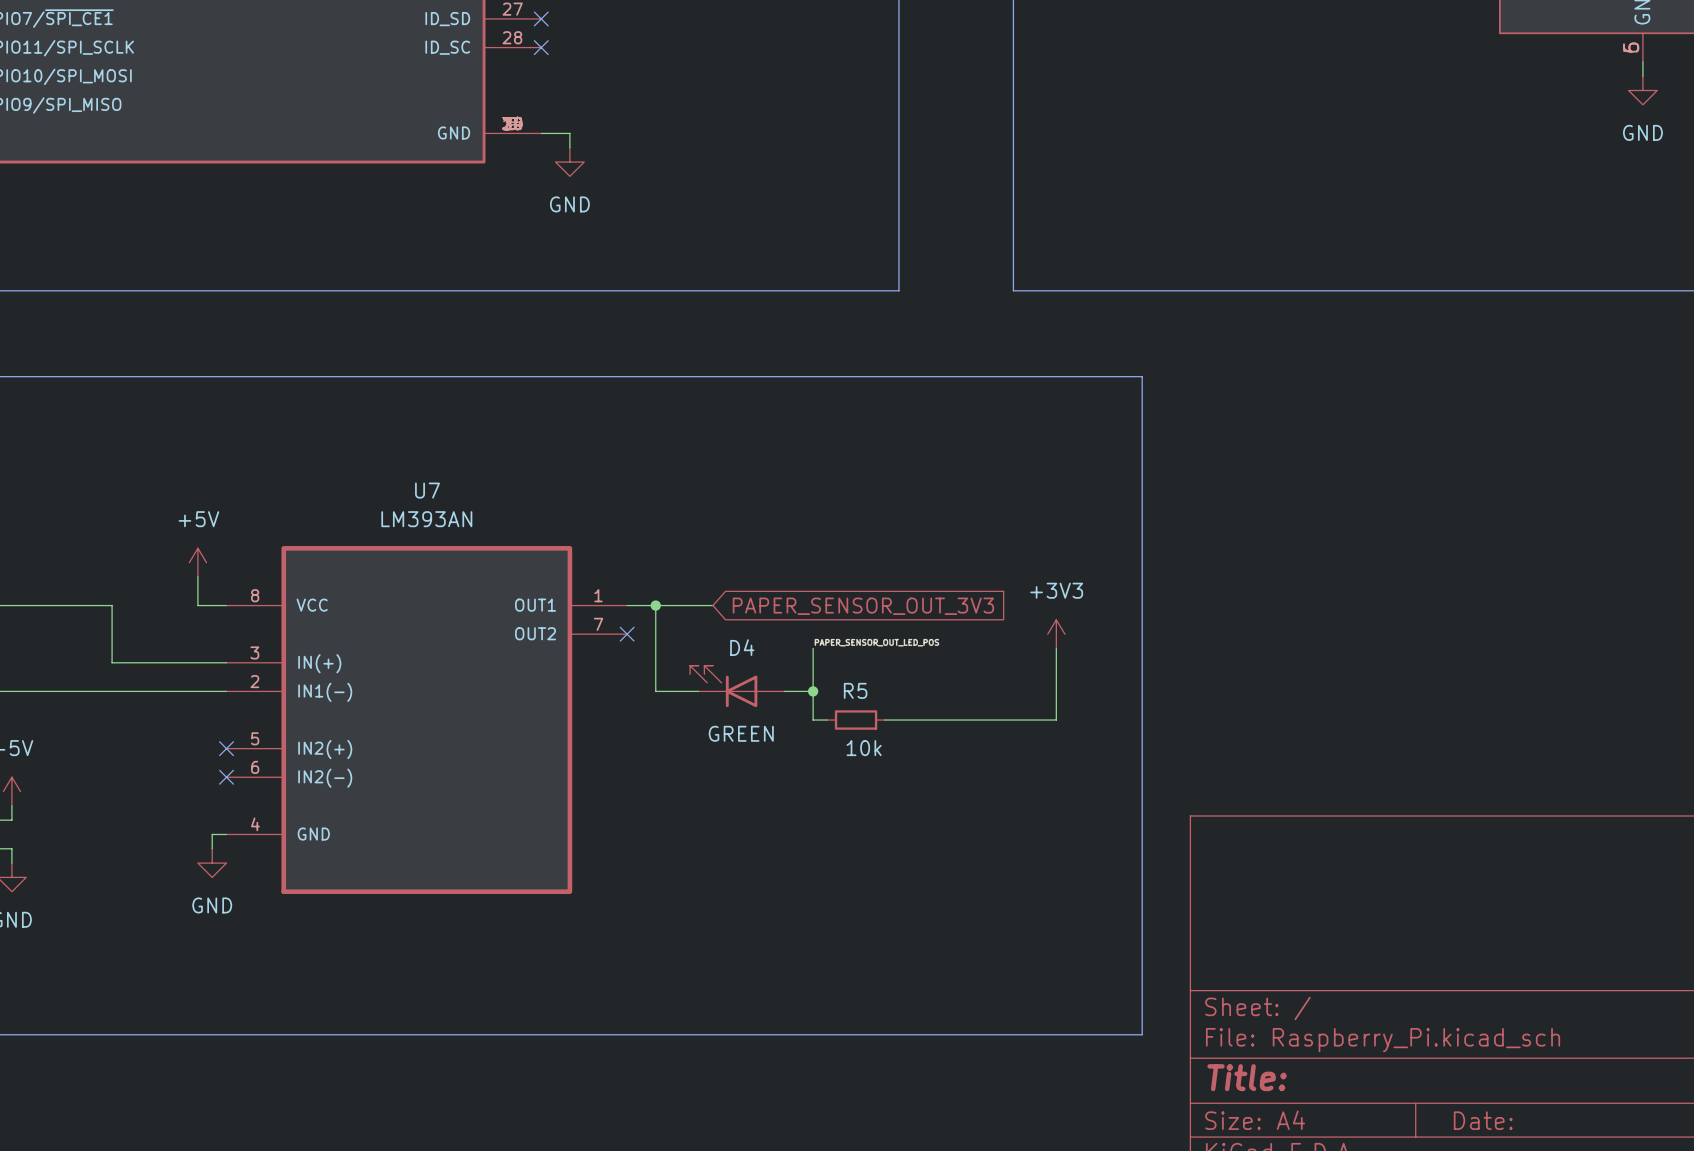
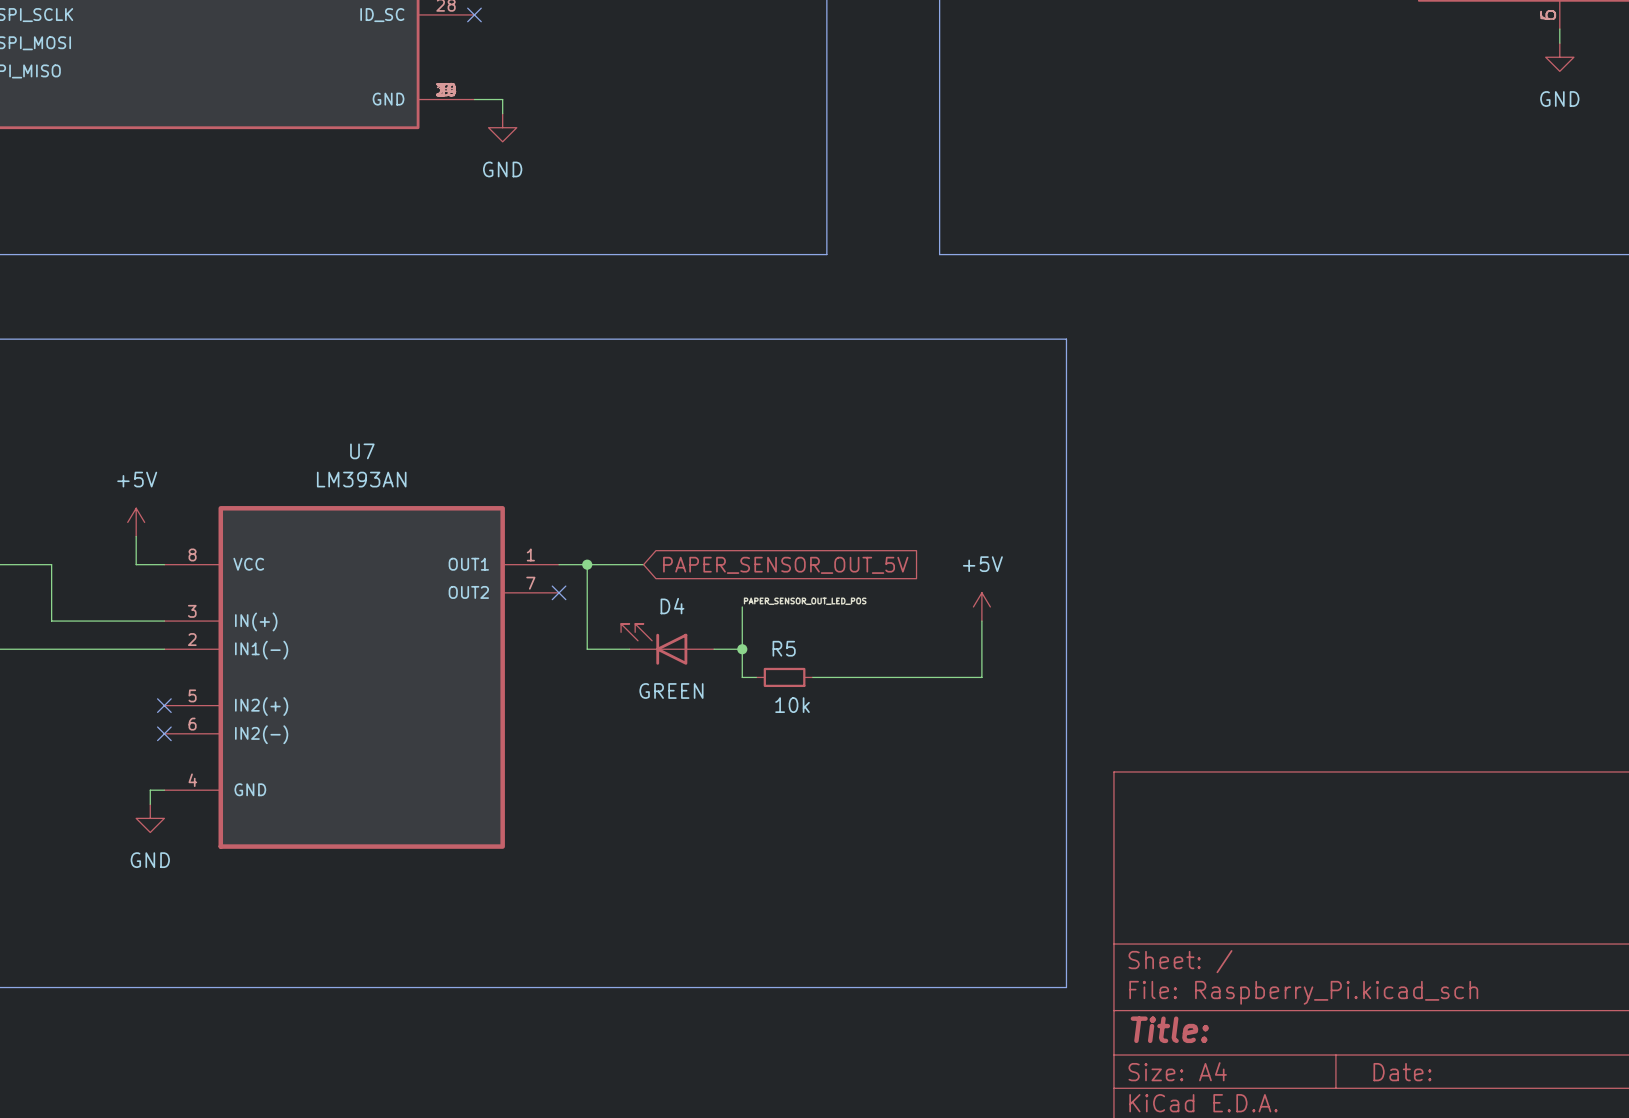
global label: PAPER_SENSOR_OUT_3V3 (863, 606) -> PAPER_SENSOR_OUT_5V (785, 565)
power symbol: +3V3 (1056, 634) -> none
power symbol: none -> +5V (981, 606)

